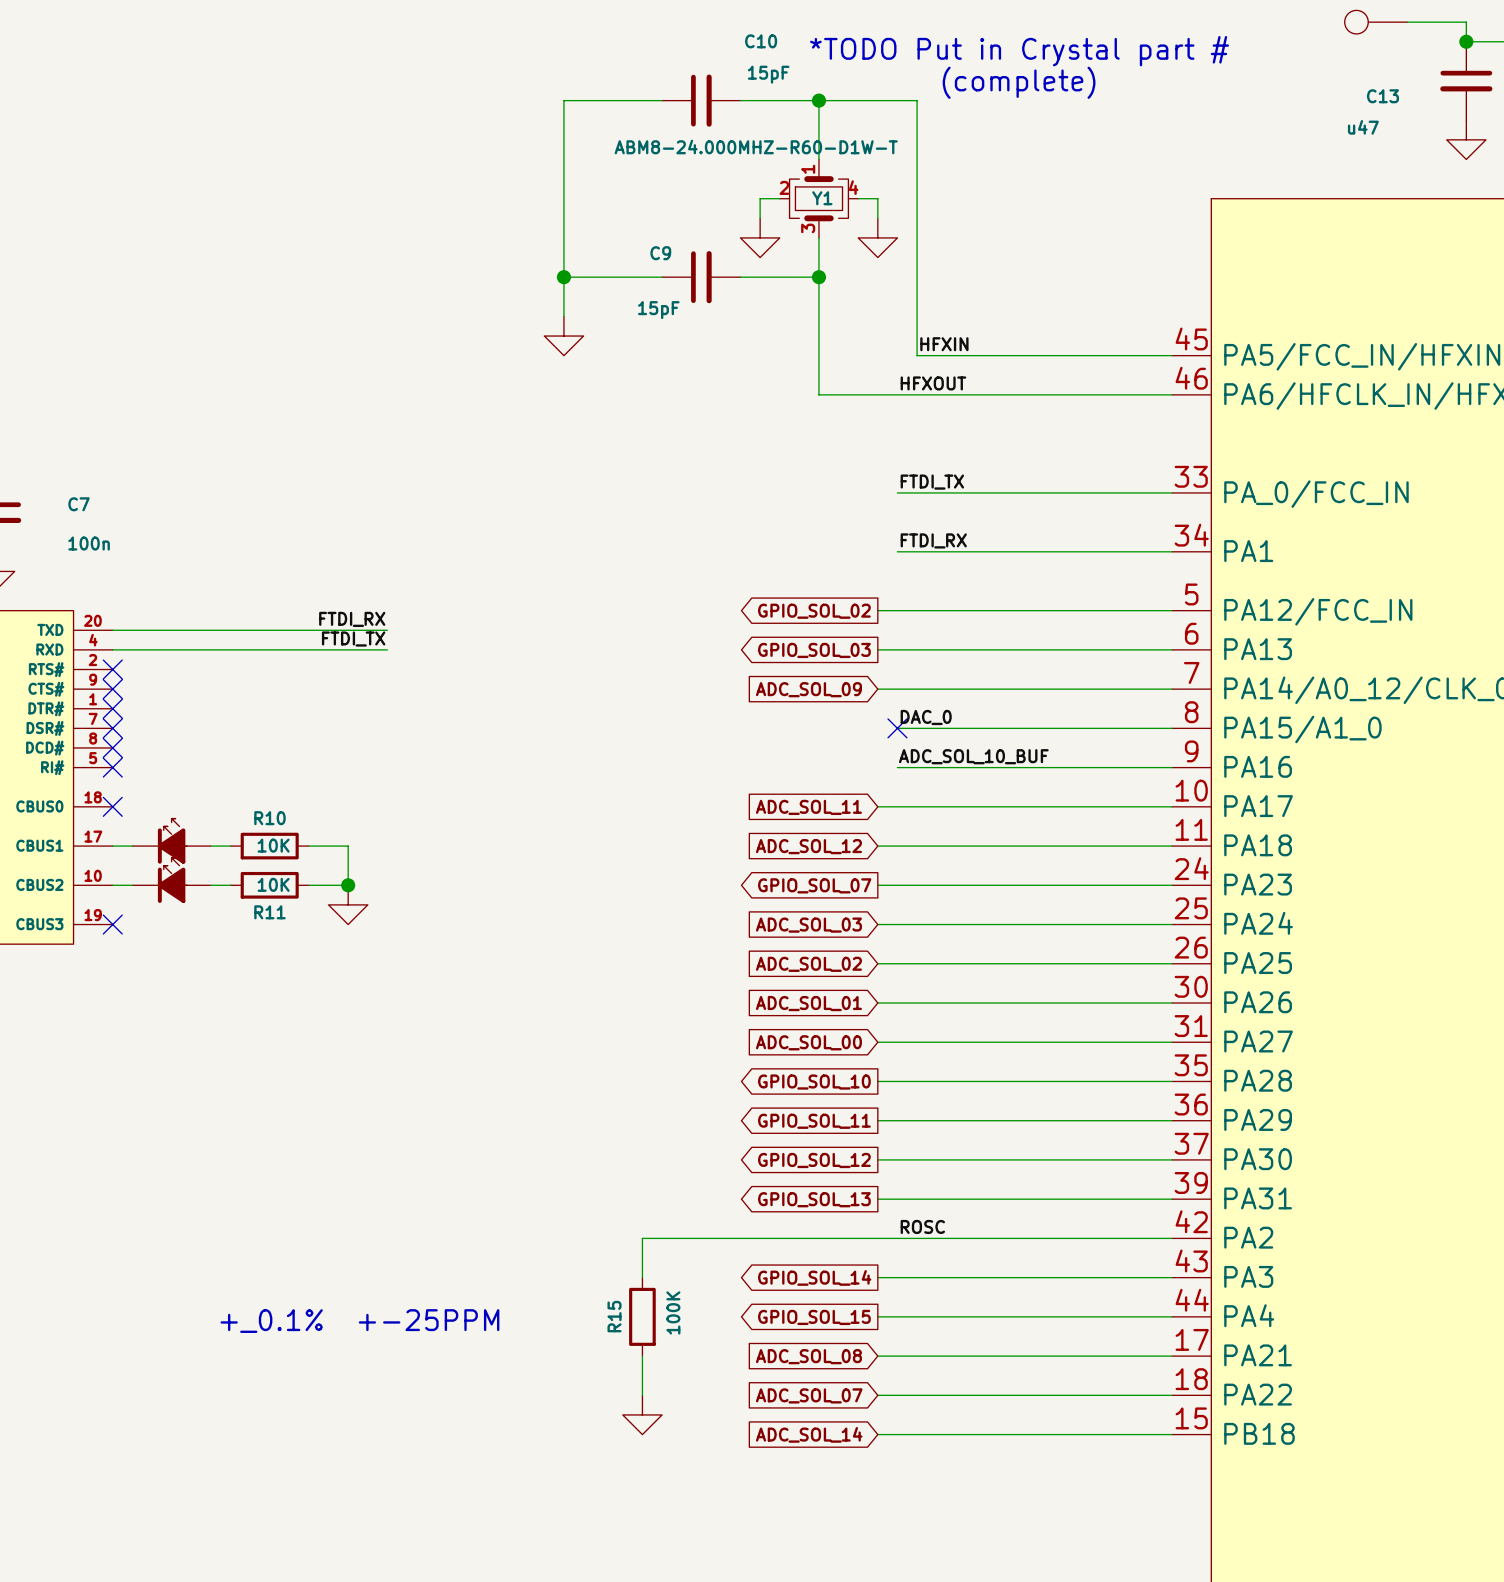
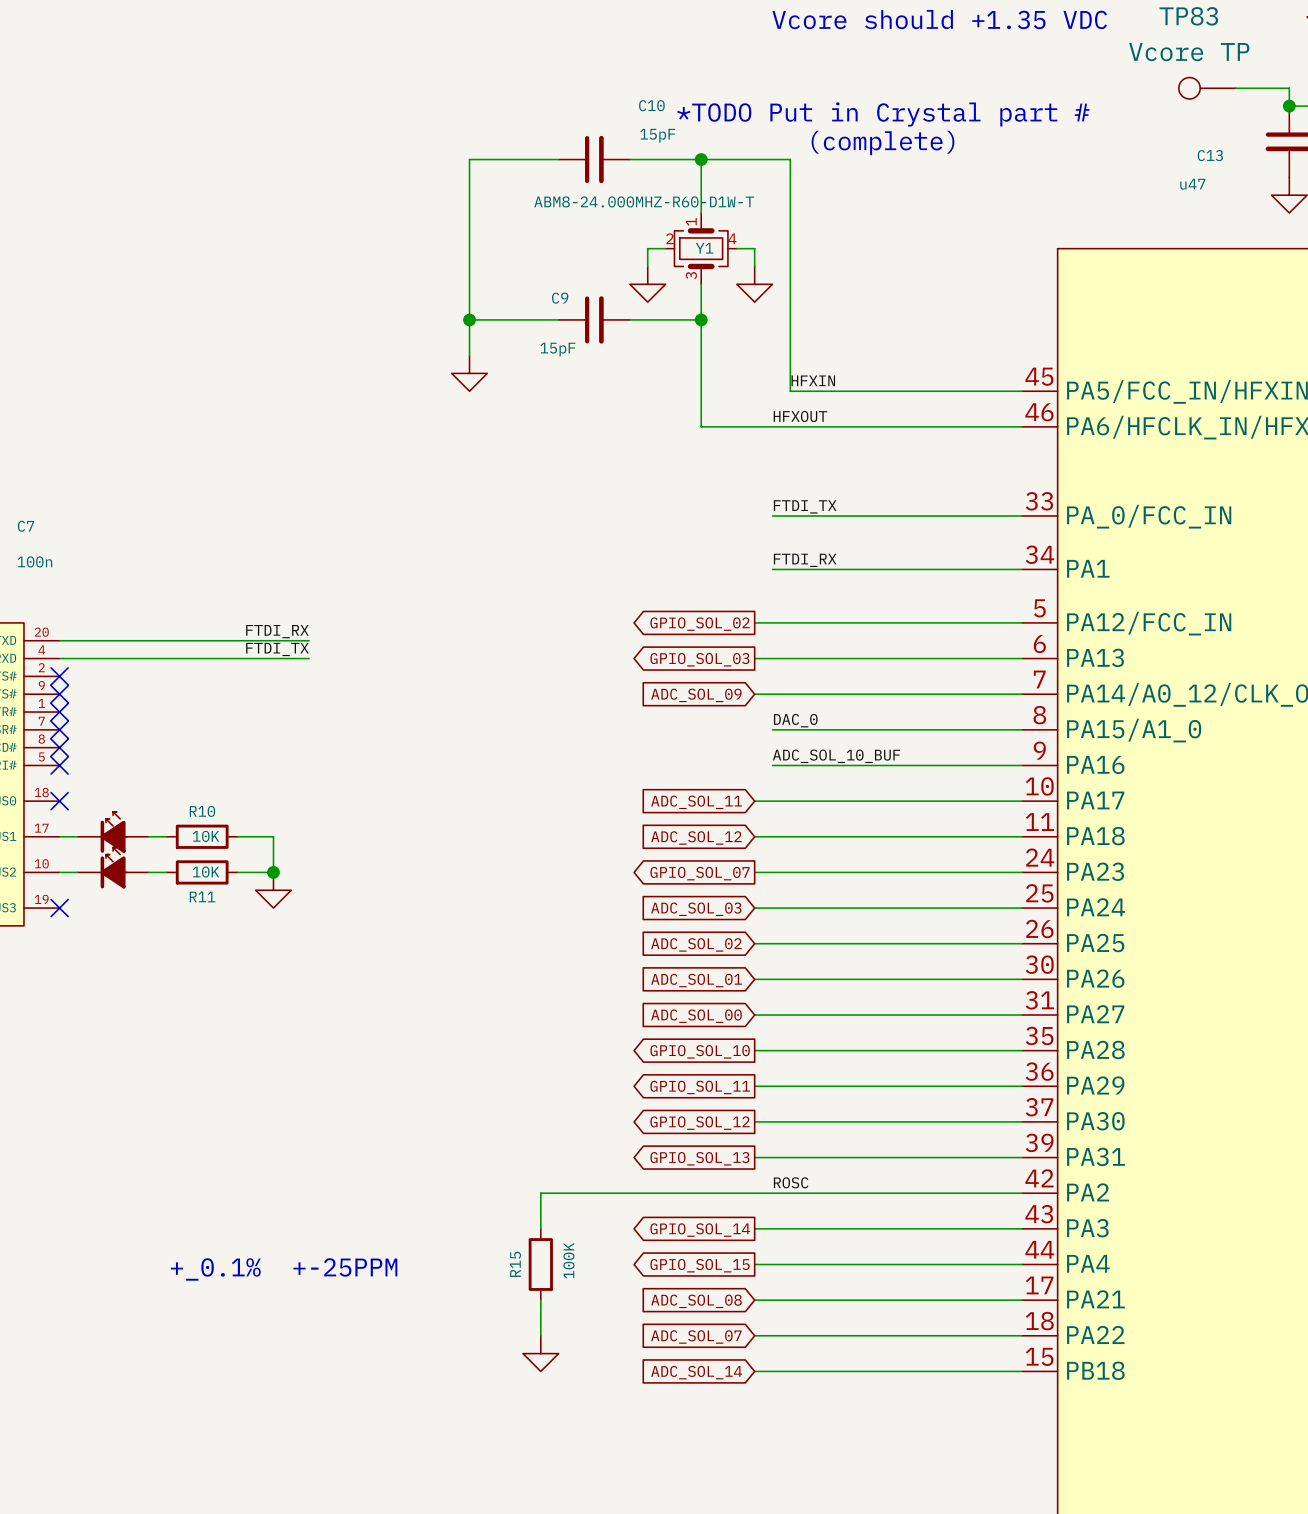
no-connect mark: (897, 728) -> none

